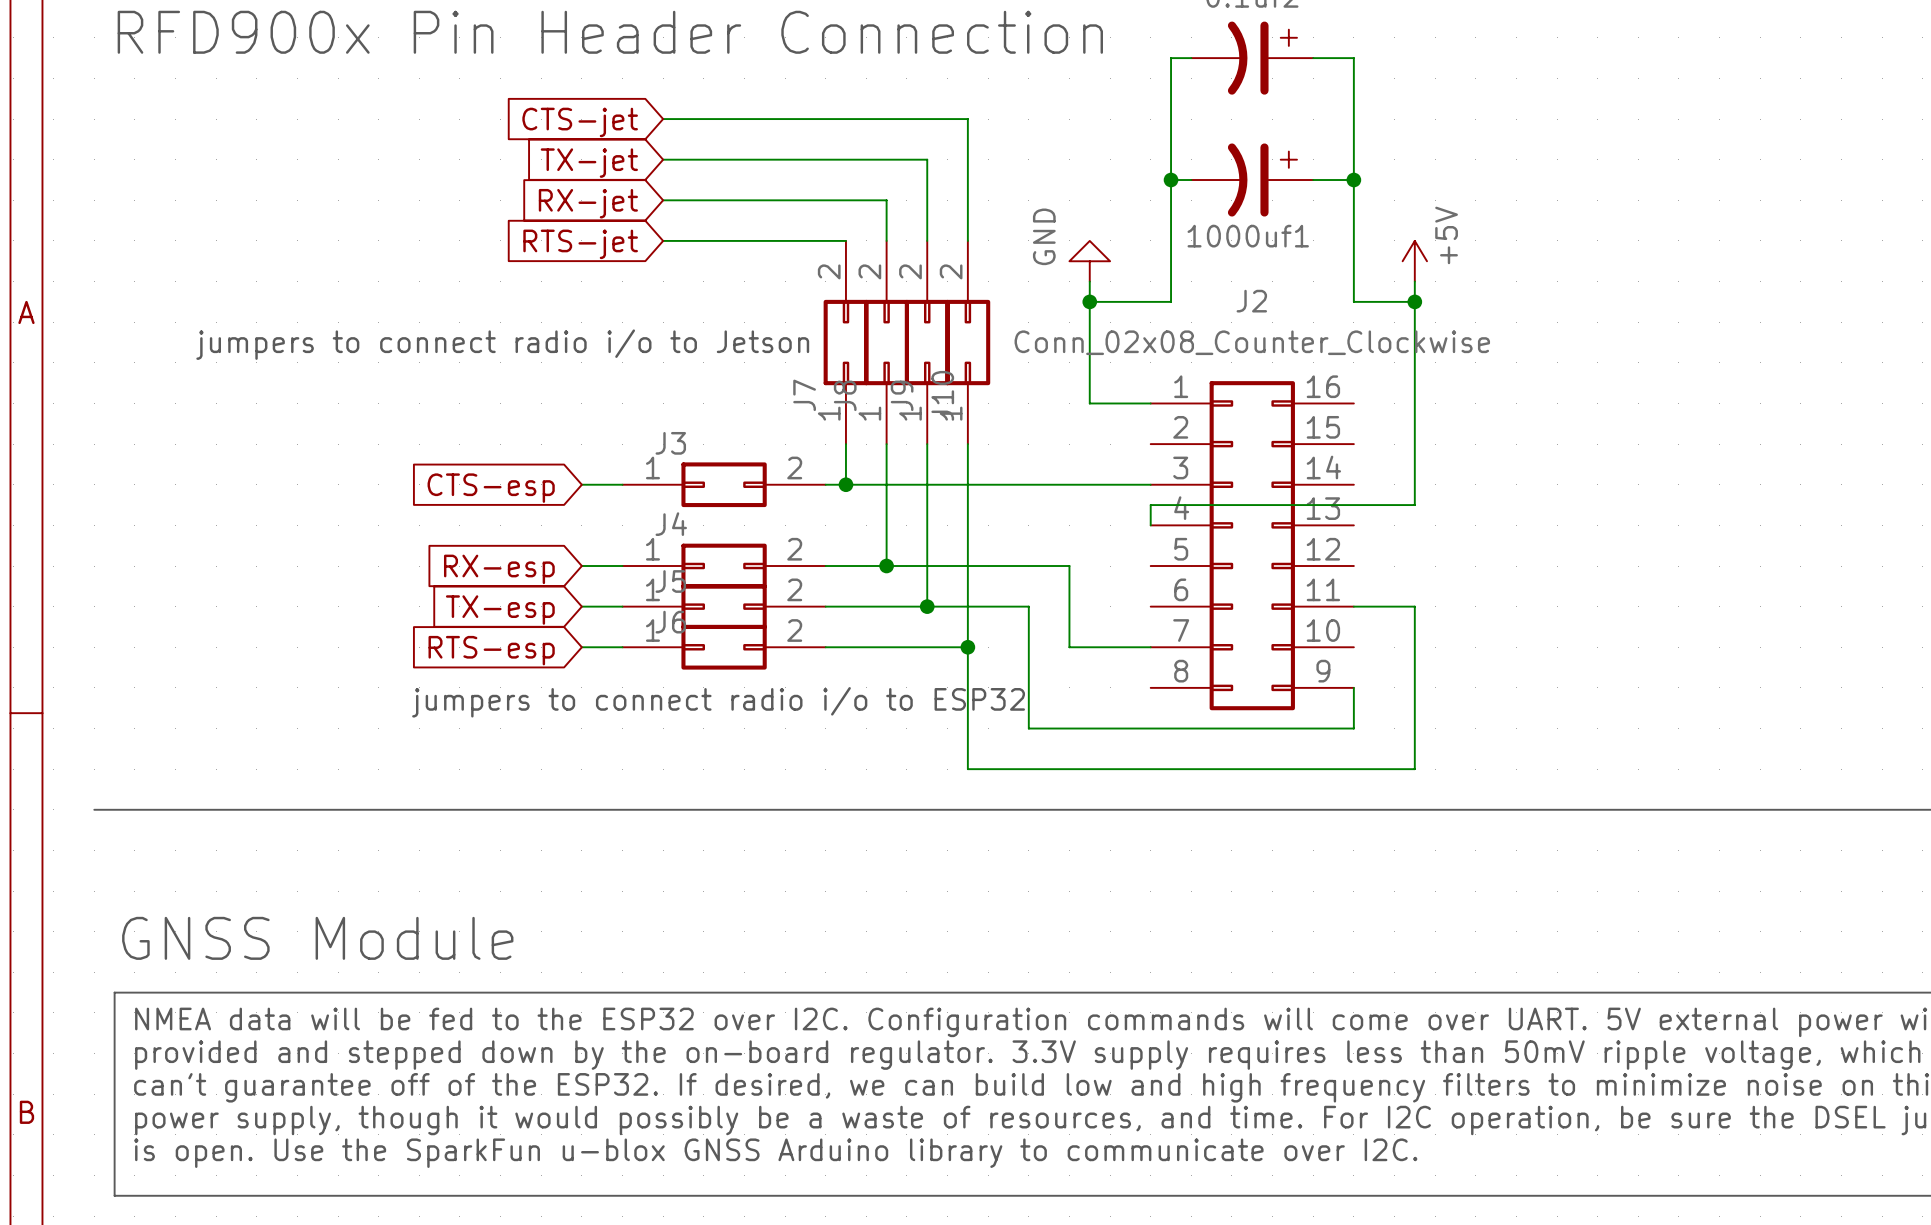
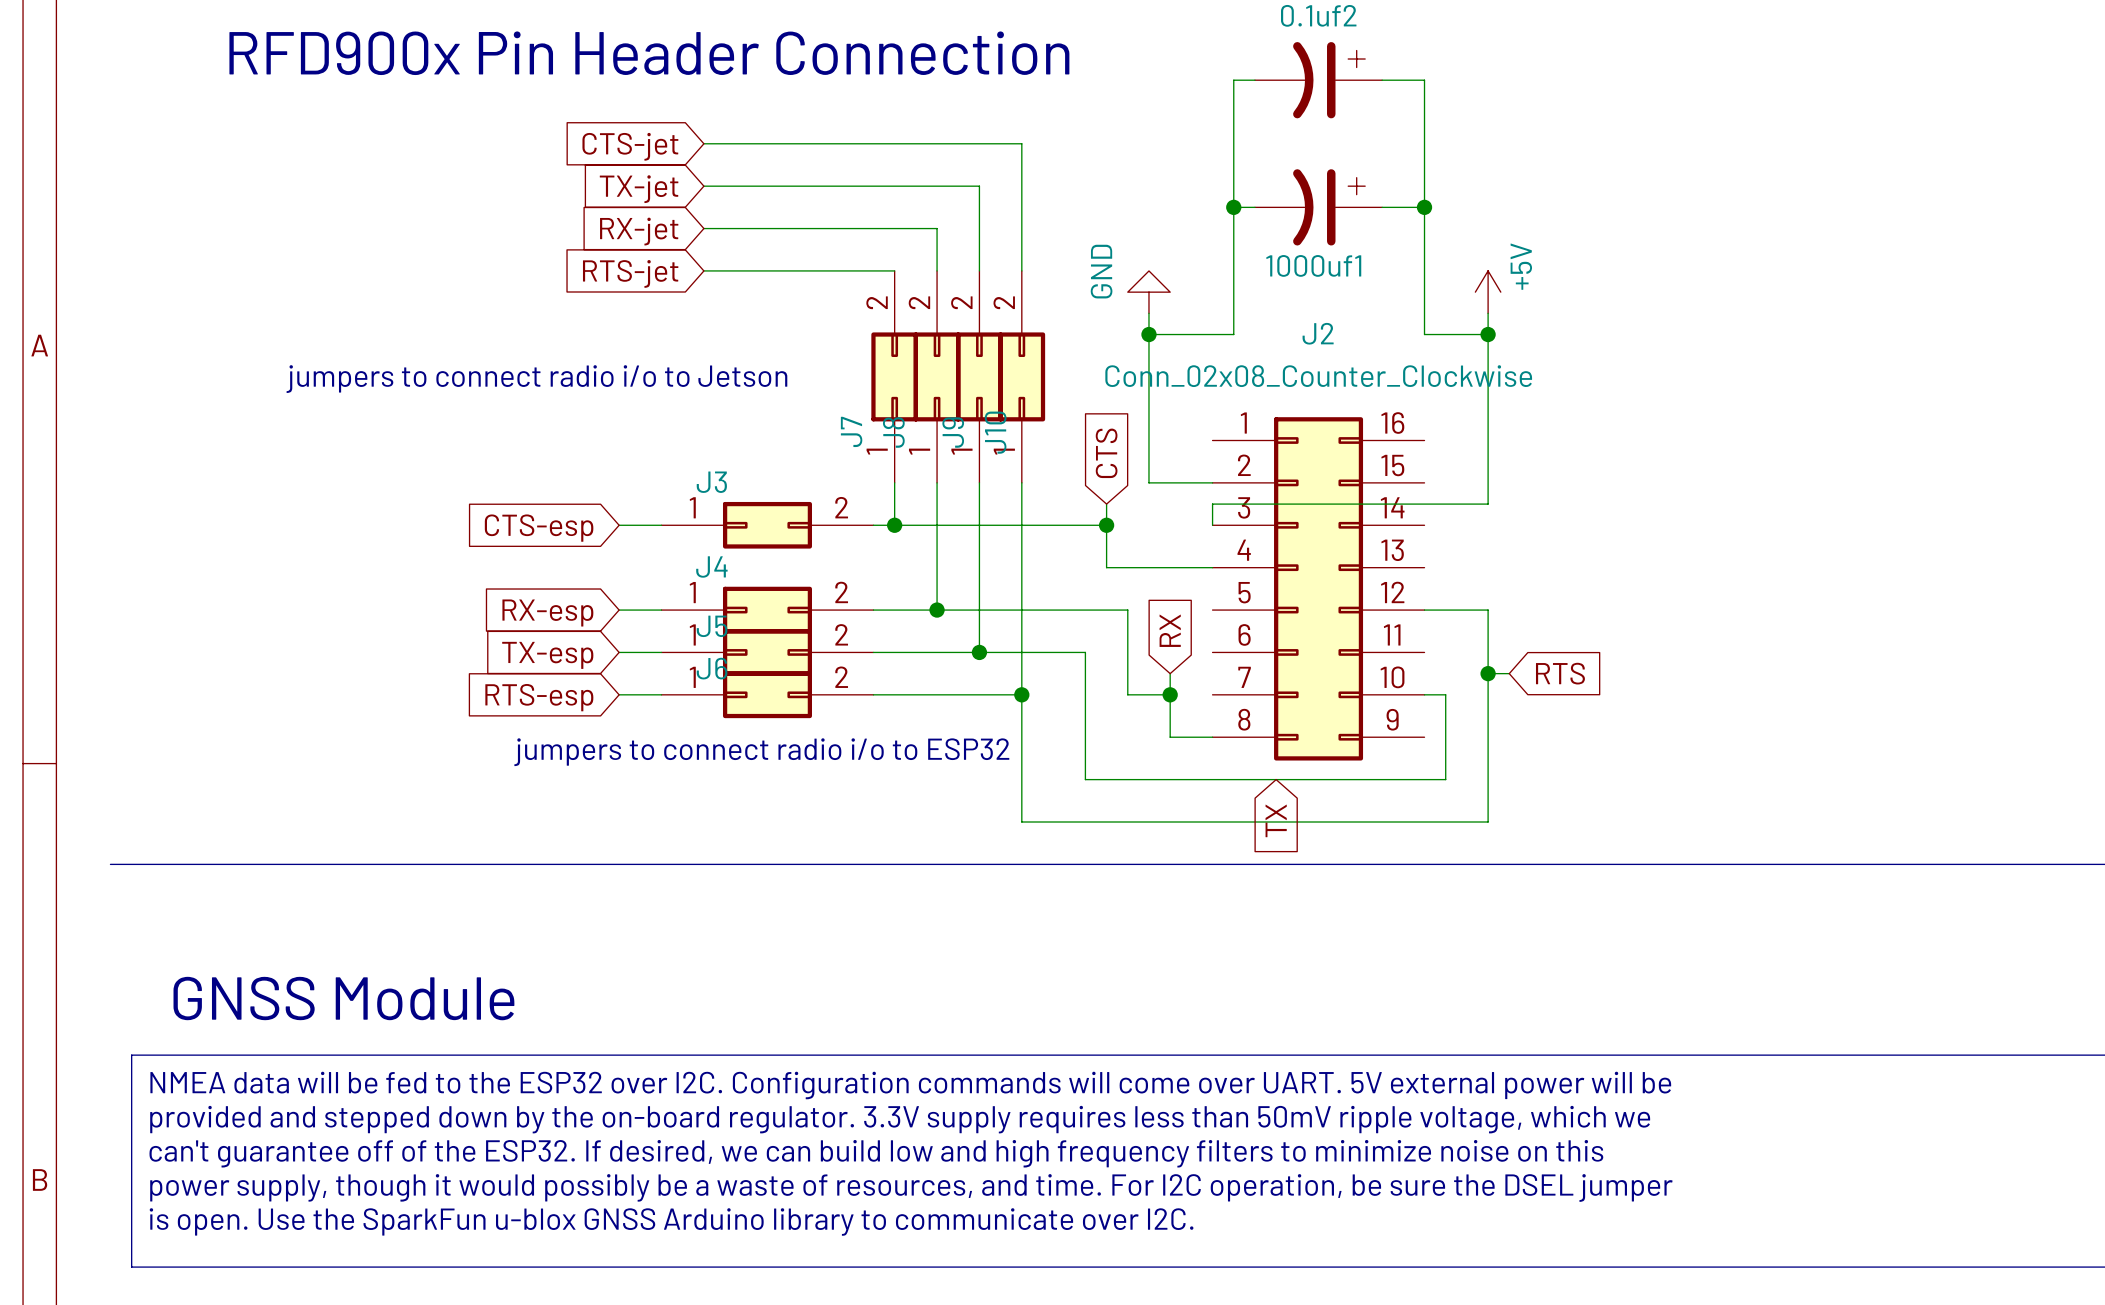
wire: (1089, 403) (1150, 403) -> (1148, 440) (1148, 482) (1212, 482)
global label: none -> CTS (1106, 453)
wire: none -> (1106, 504) (1106, 567) (1212, 567)
wire: (1414, 464) (1414, 505) (1150, 505) (1150, 525) -> (1488, 504) (1212, 504) (1212, 525)
wire: (1049, 484) (1150, 484) -> none
junction: none -> (1106, 525)
global label: none -> RX (1170, 630)
wire: (1353, 606) (1414, 606) -> (1424, 610) (1488, 610) (1488, 652)
wire: none -> (1170, 673) (1170, 737) (1212, 737)
wire: none -> (1488, 673) (1509, 673)
junction: none -> (1488, 673)
global label: none -> RTS (1560, 673)
wire: (1110, 647) (1150, 647) -> none
junction: none -> (1170, 694)
wire: (1353, 687) (1353, 728) -> (1424, 694) (1445, 694) (1445, 779) (1424, 779)
global label: none -> TX (1276, 820)

